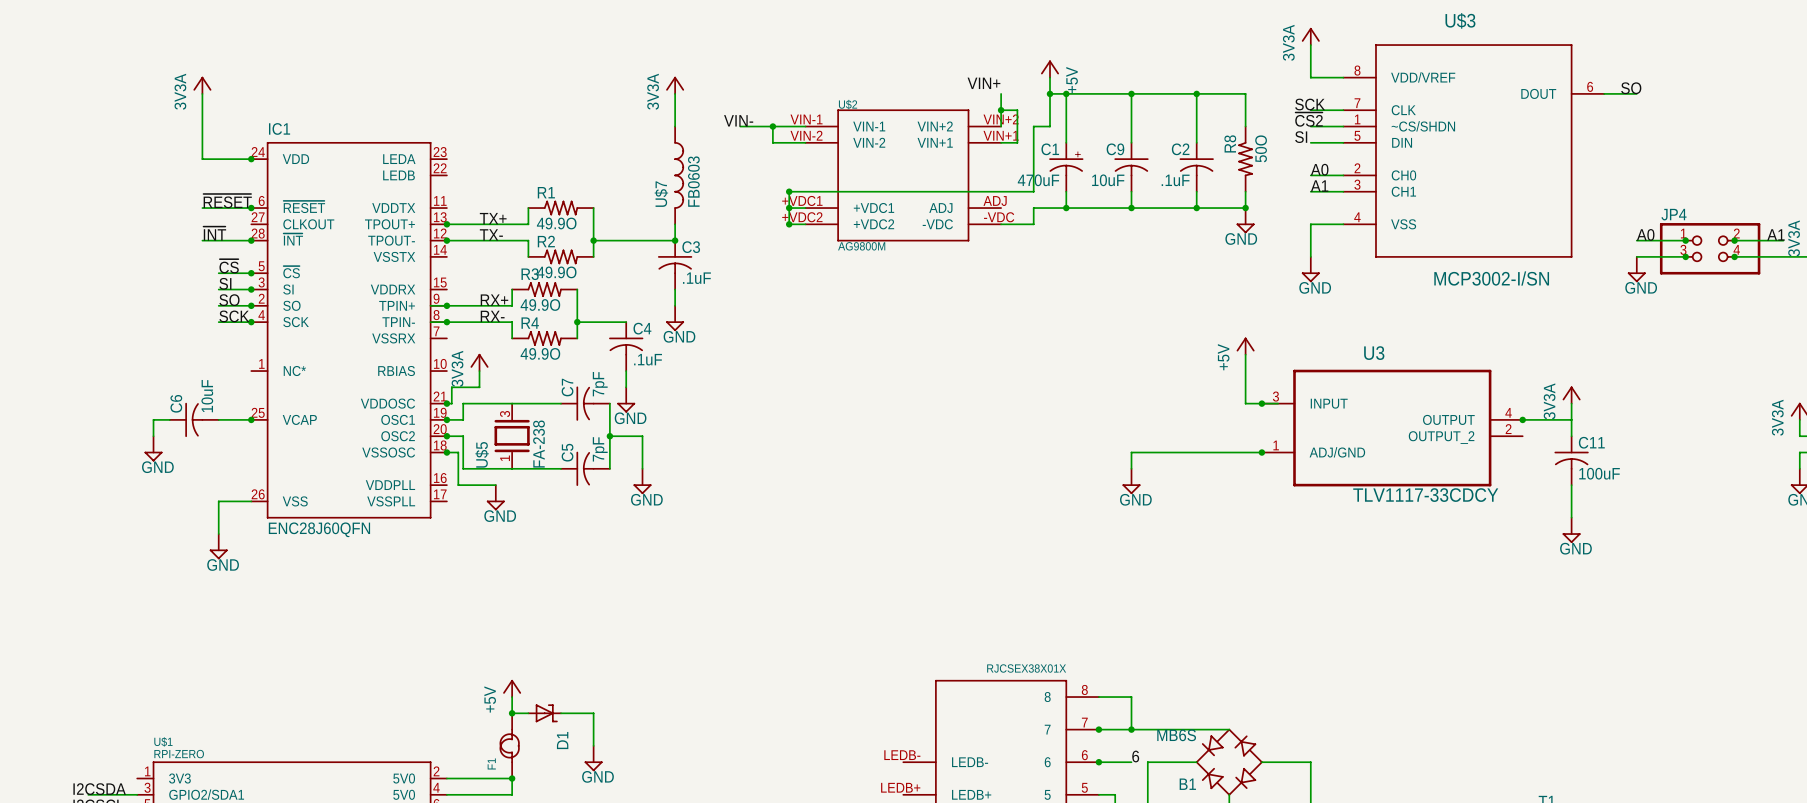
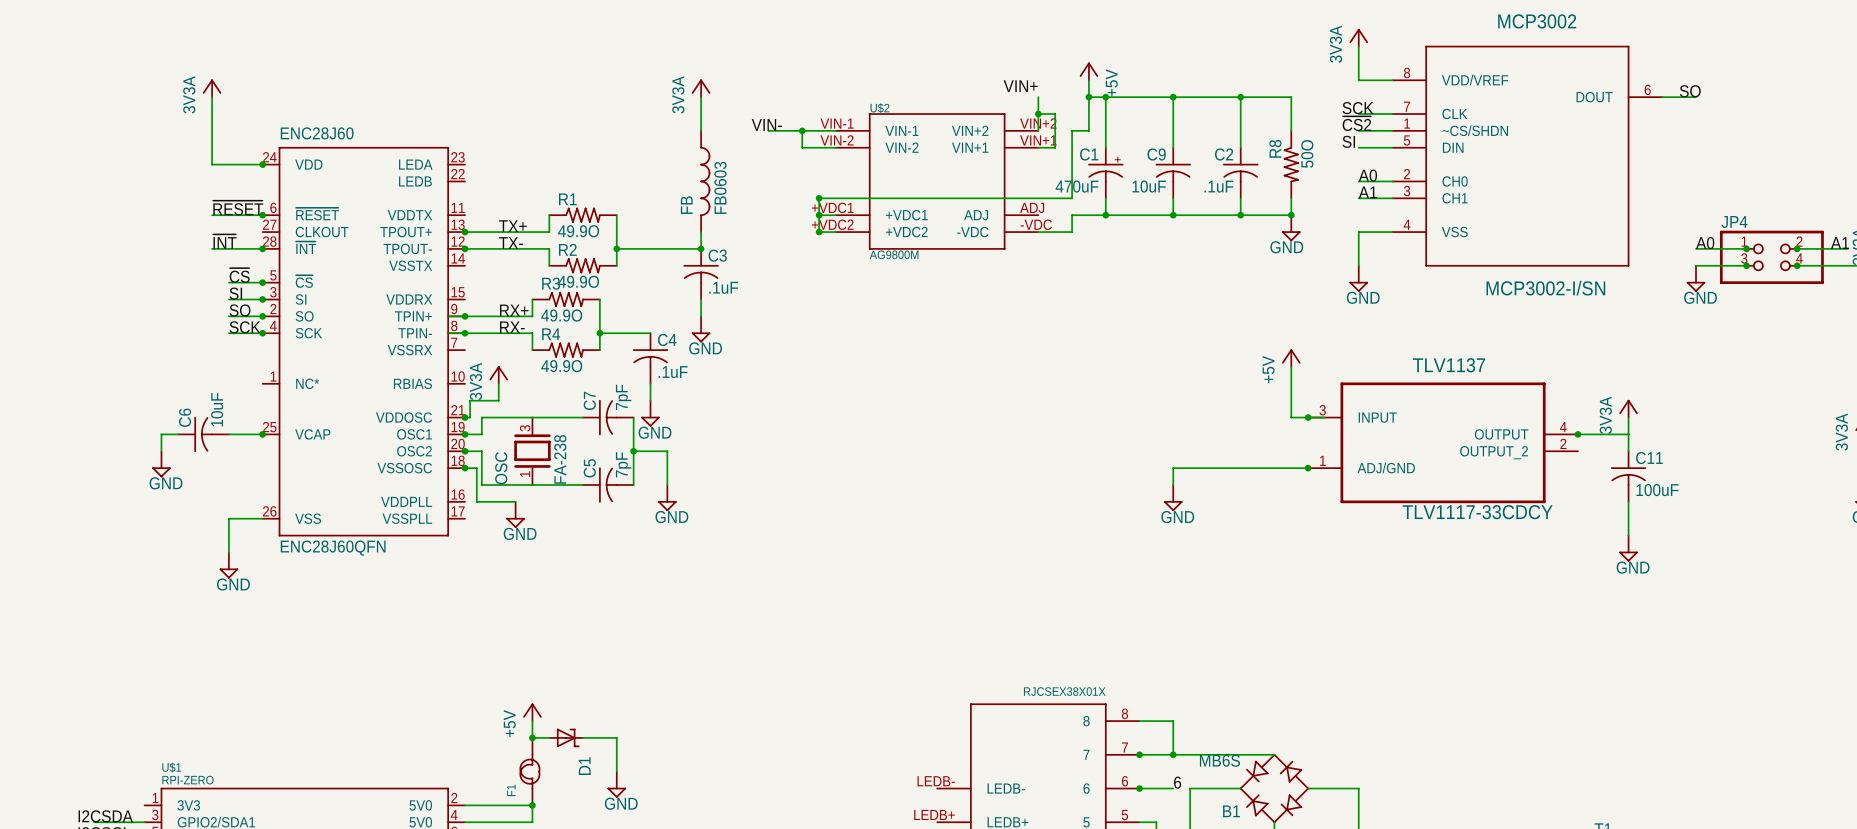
U$3 name: U$3 (1460, 20) -> MCP3002 (1537, 21)
IC1 name: IC1 (279, 128) -> ENC28J60 (317, 133)
U$7 name: U$7 (661, 194) -> FB (686, 205)
U3 name: U3 (1374, 353) -> TLV1137 (1448, 365)
U$5 name: U$5 (482, 454) -> OSC (501, 468)

